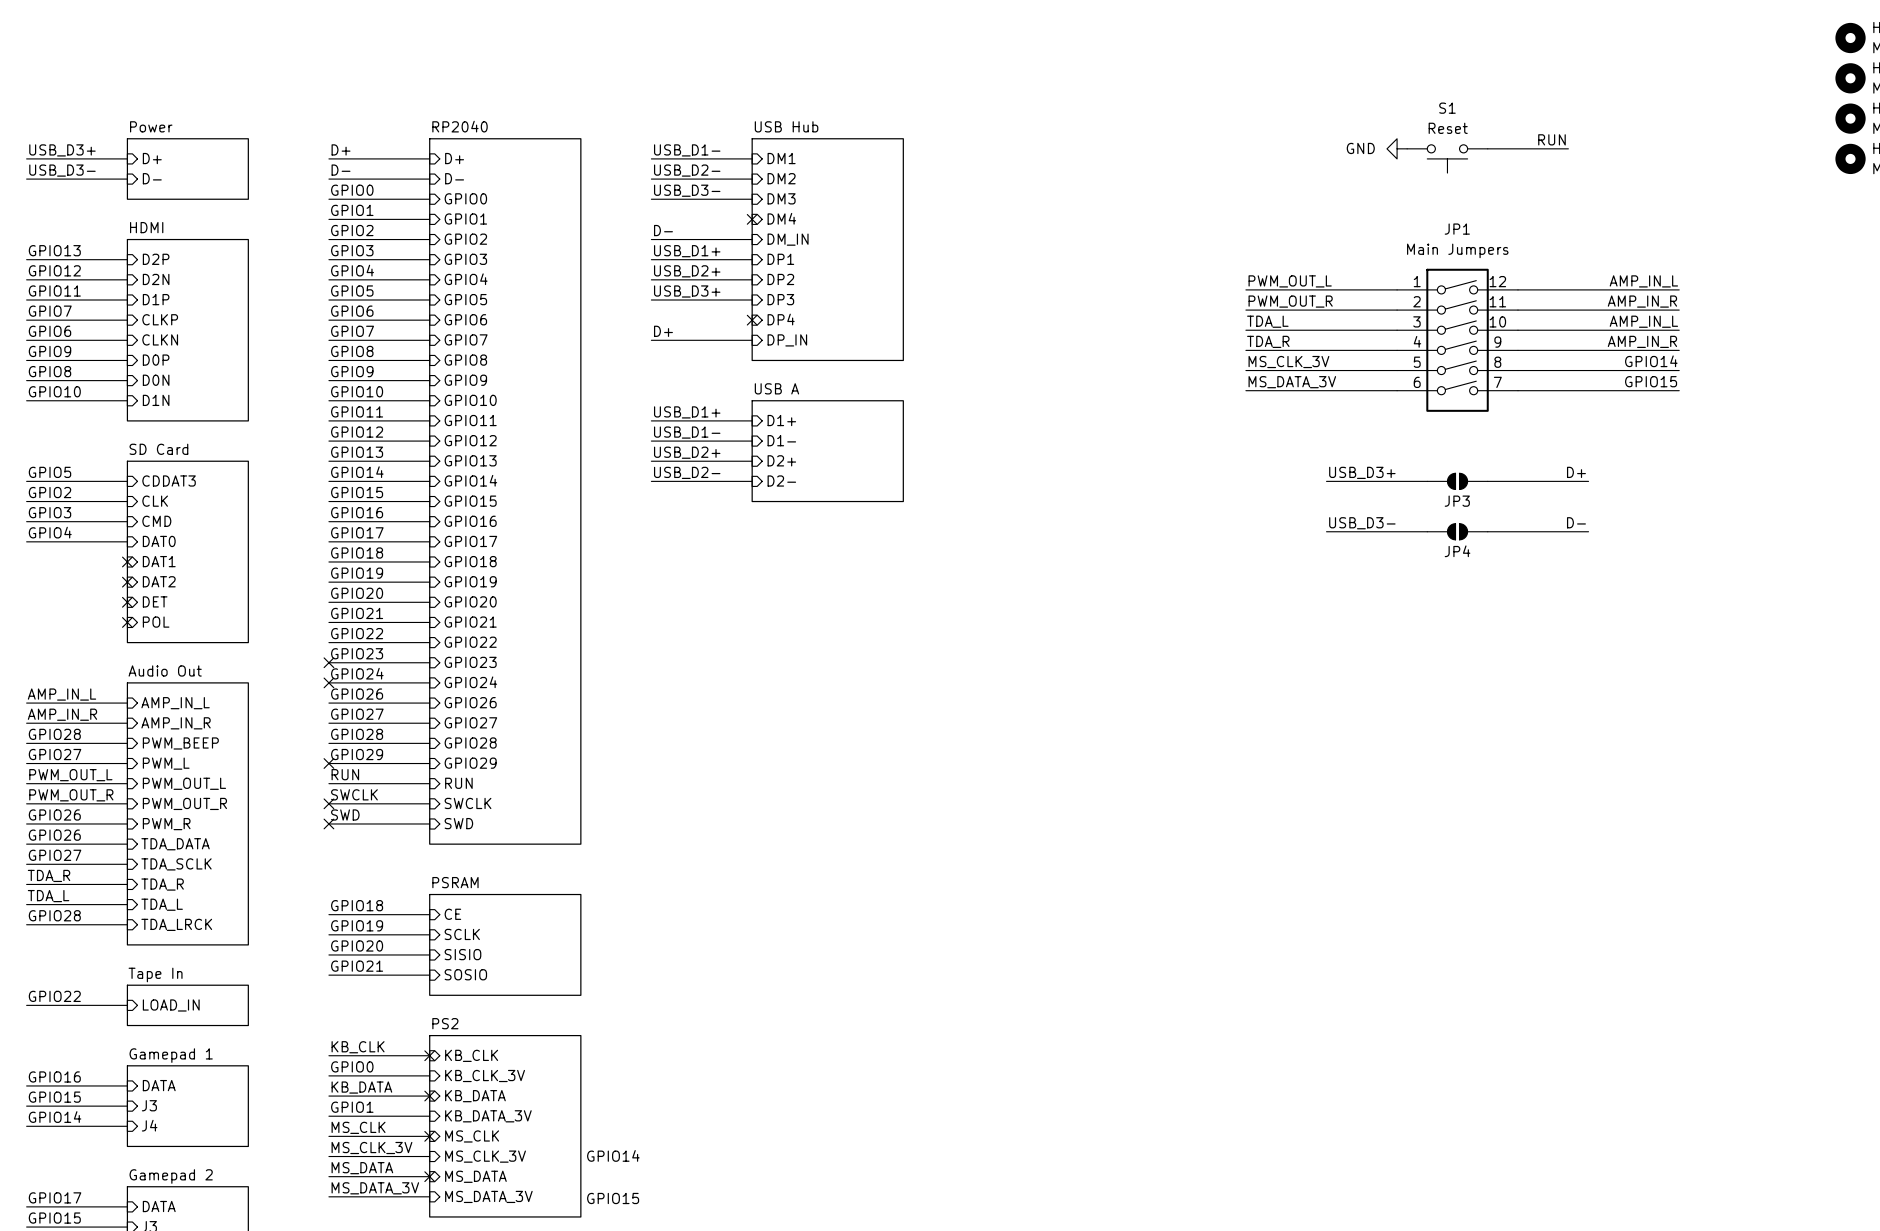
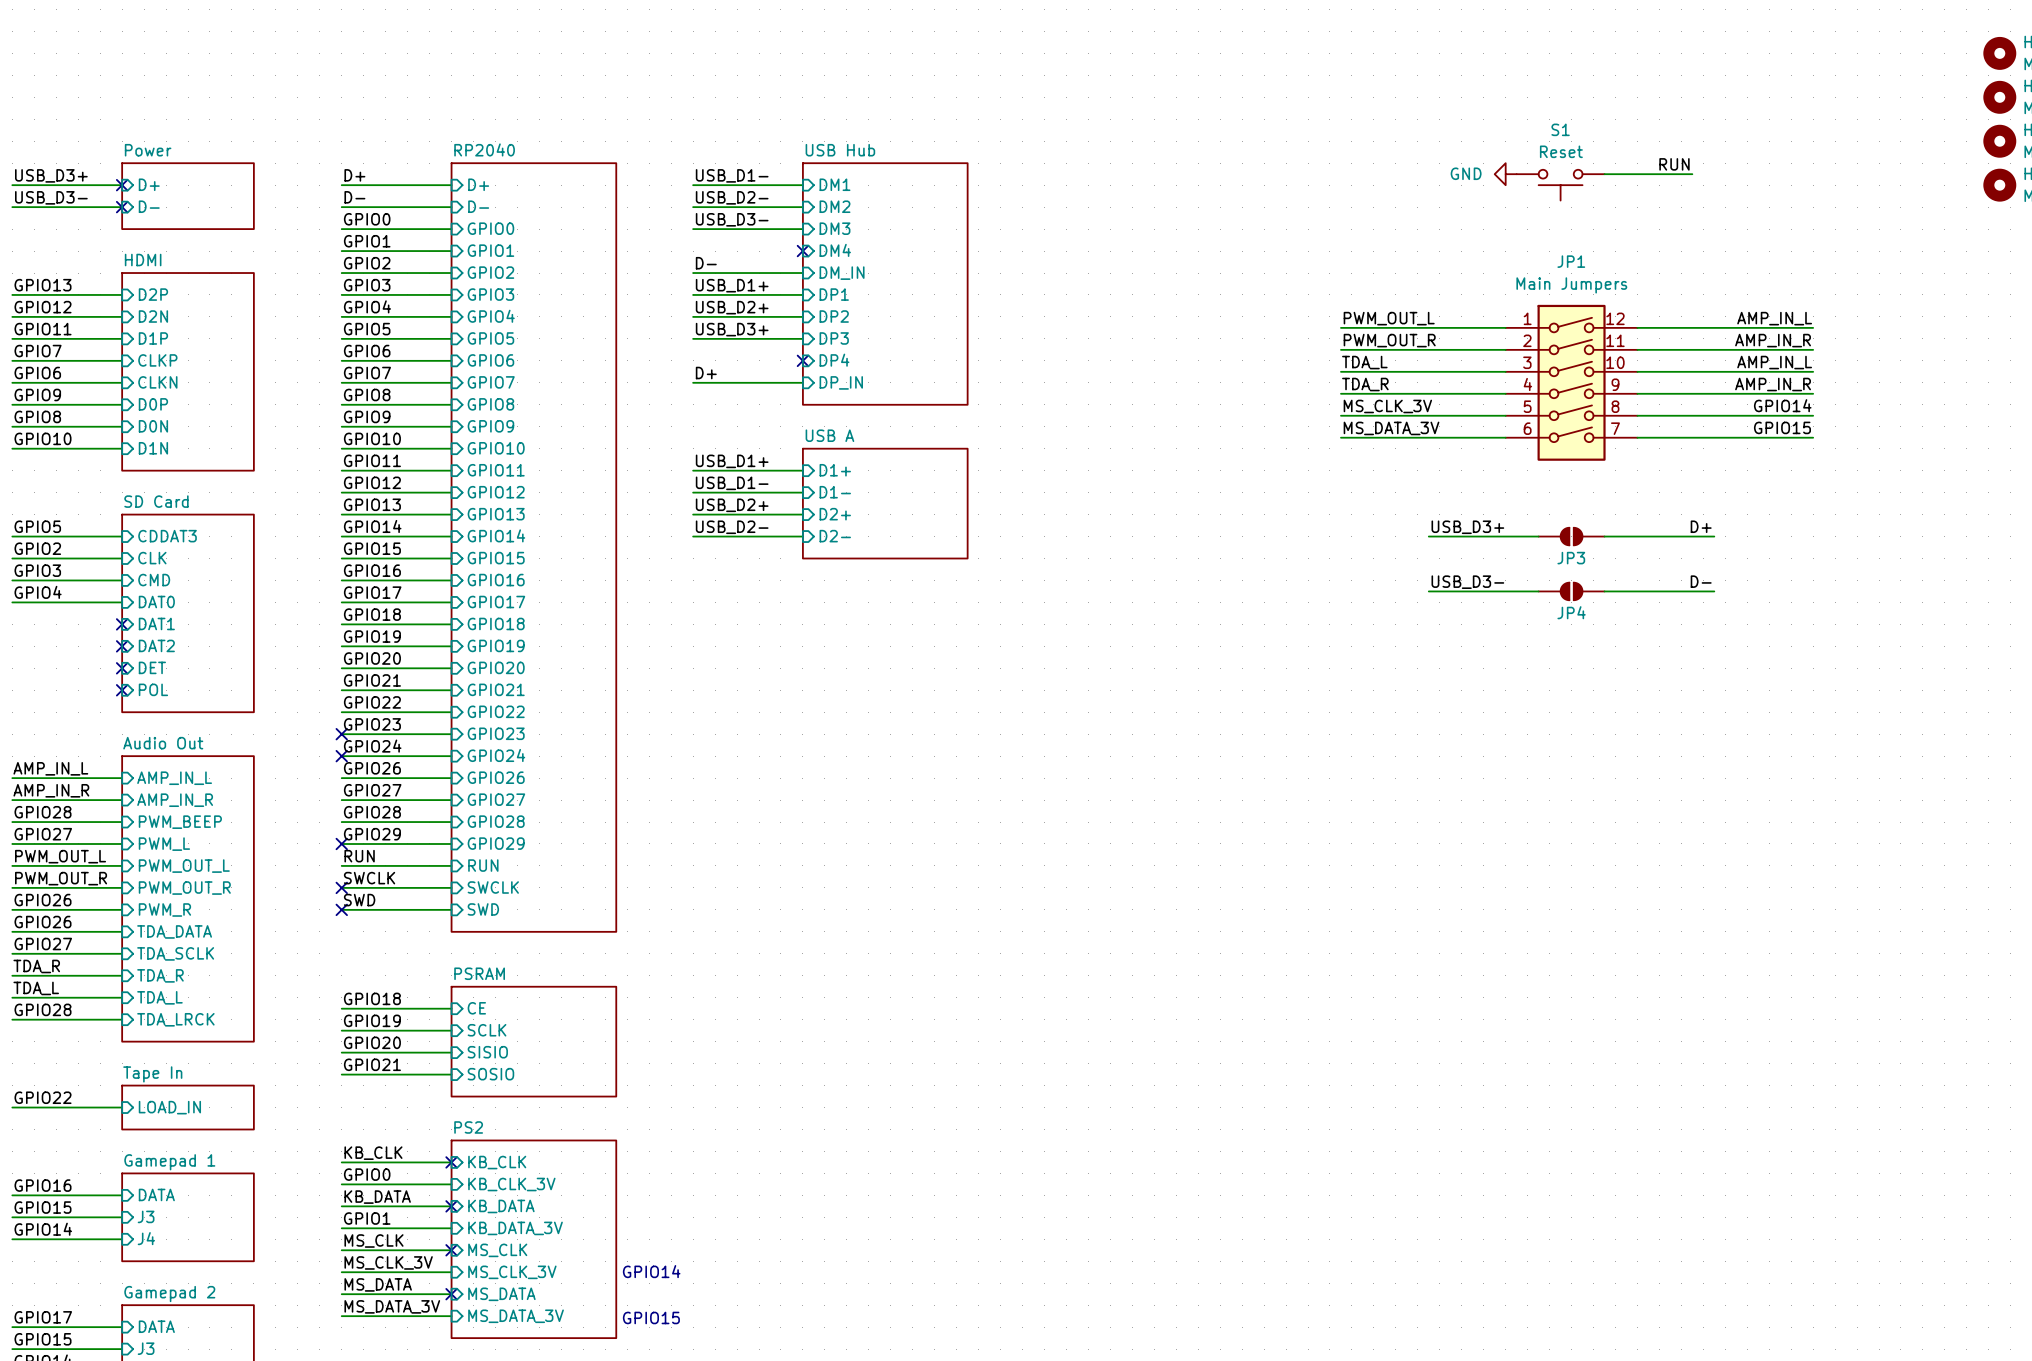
no-connect mark: none -> (122, 185)
no-connect mark: none -> (122, 207)

